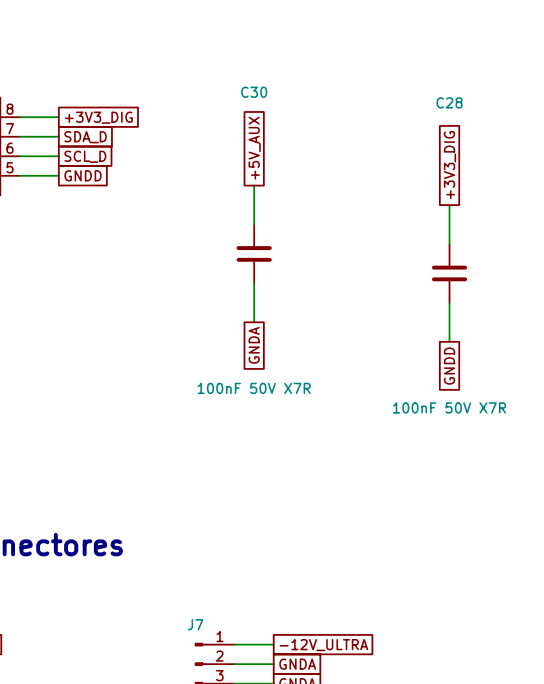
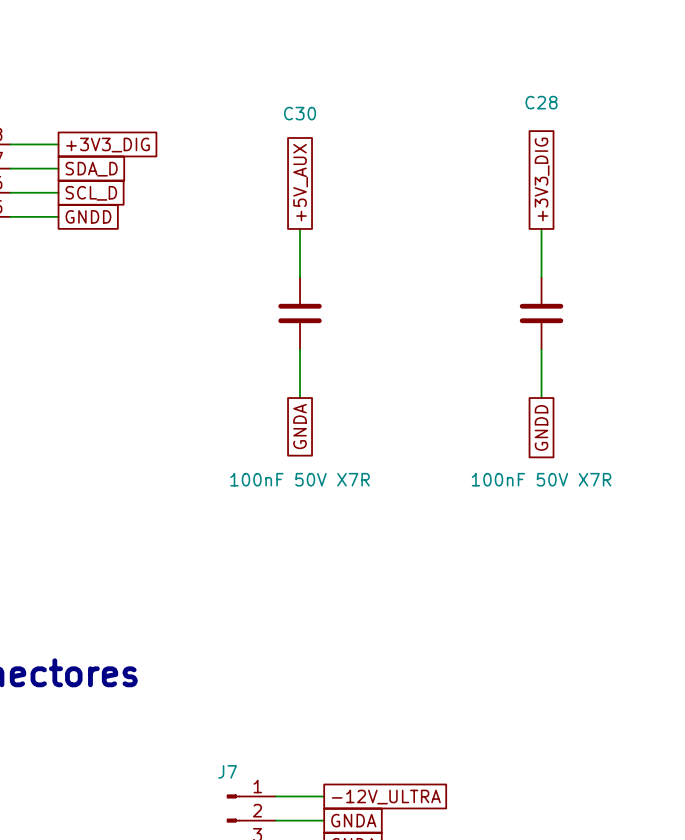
global label position: +3V3_DIG (449, 165) -> +3V3_DIG (542, 179)
C28 position: (449, 273) -> (541, 313)
global label position: GNDD (449, 366) -> GNDD (541, 427)

